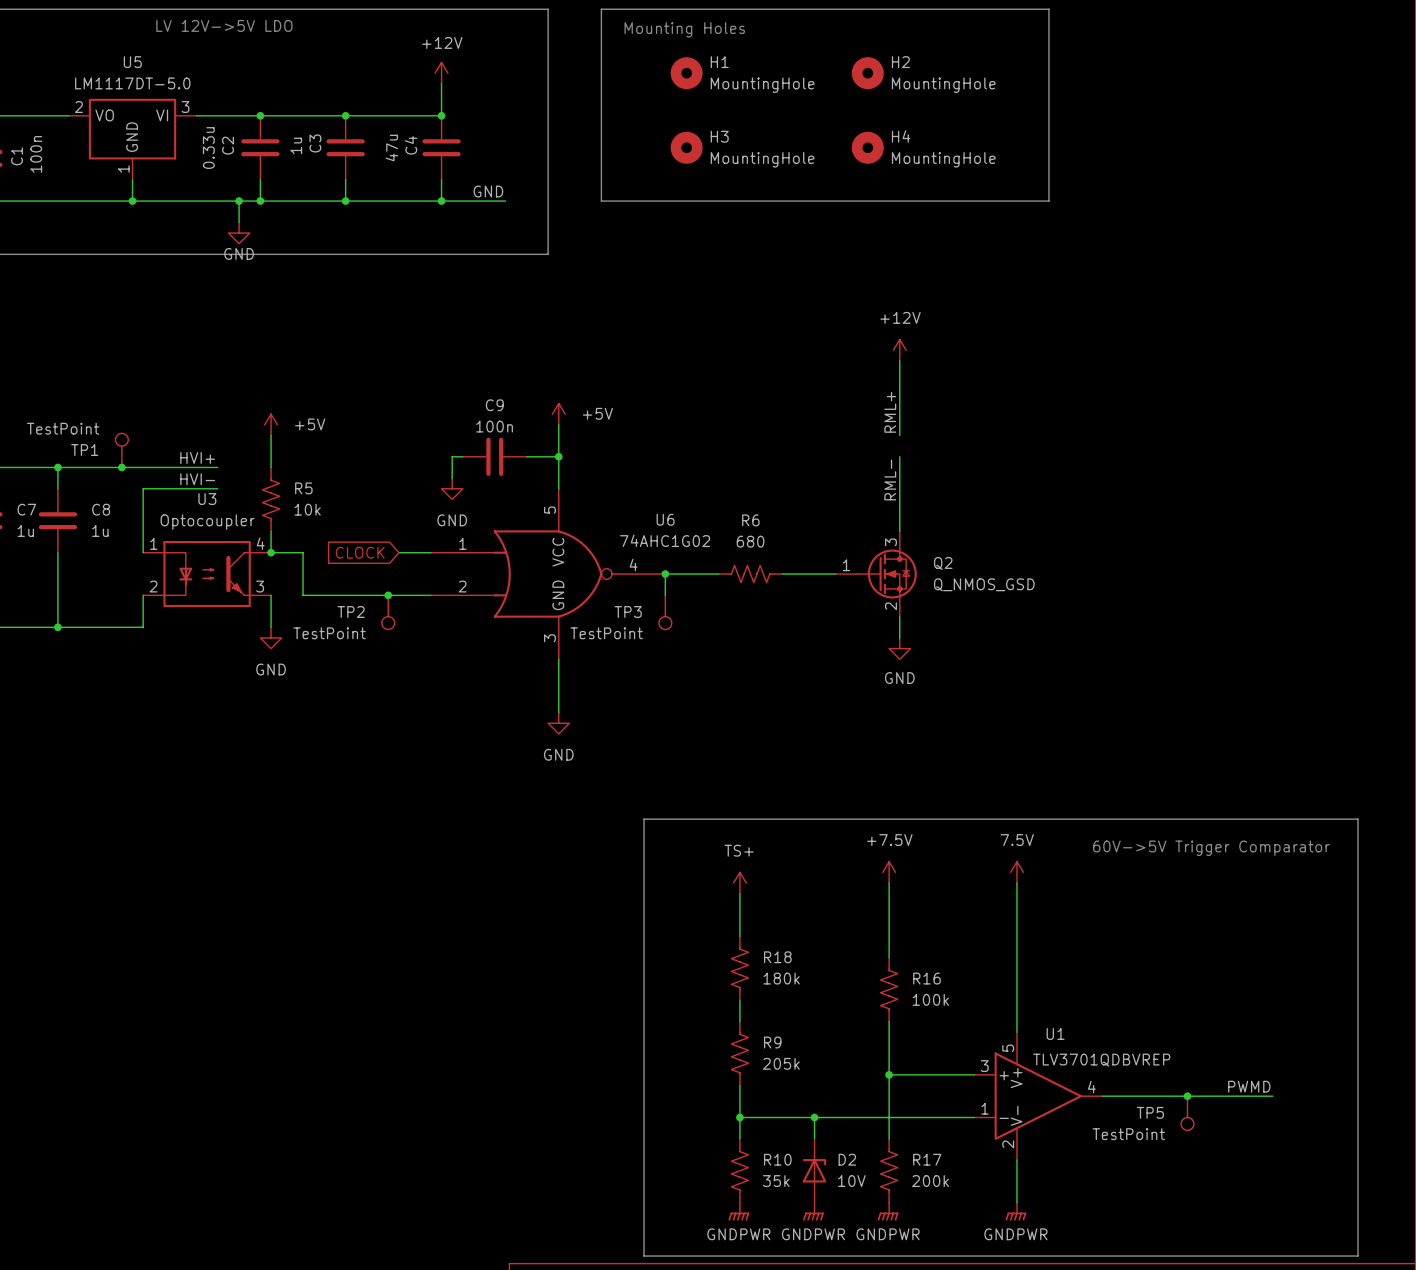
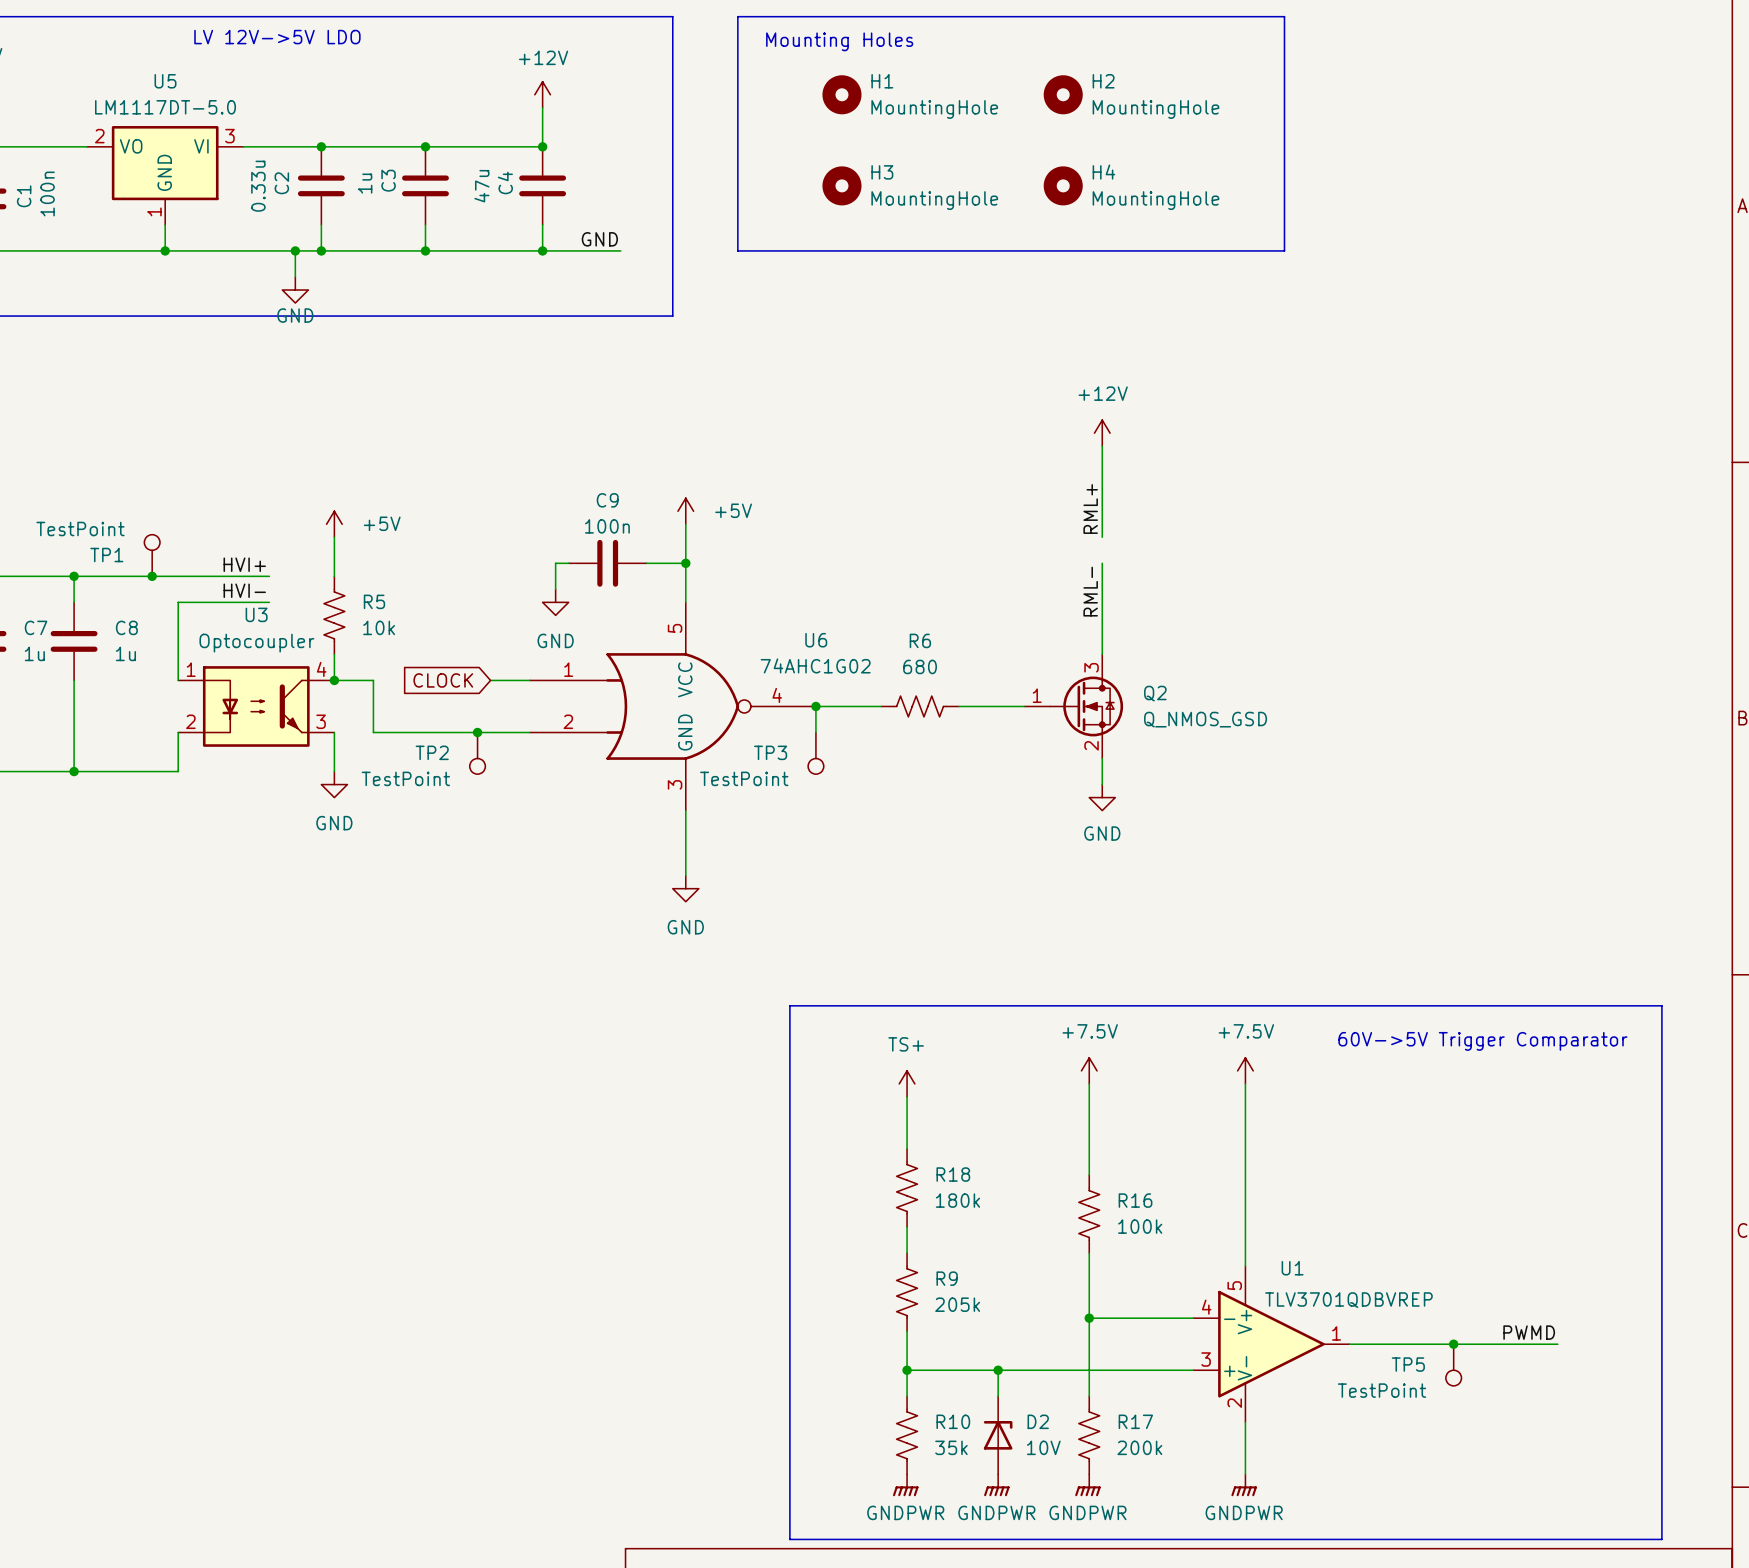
power symbol: 7.5V (1016, 872) -> +7.5V (1245, 1070)
U1 pin number: 3 (984, 1066) -> 4 (1206, 1307)
U1 pin name: + (1004, 1075) -> - (1229, 1319)
U1 pin number: 4 (1091, 1087) -> 1 (1336, 1333)
U1 pin number: 1 (985, 1108) -> 3 (1206, 1359)
U1 pin name: - (1004, 1118) -> + (1229, 1371)

